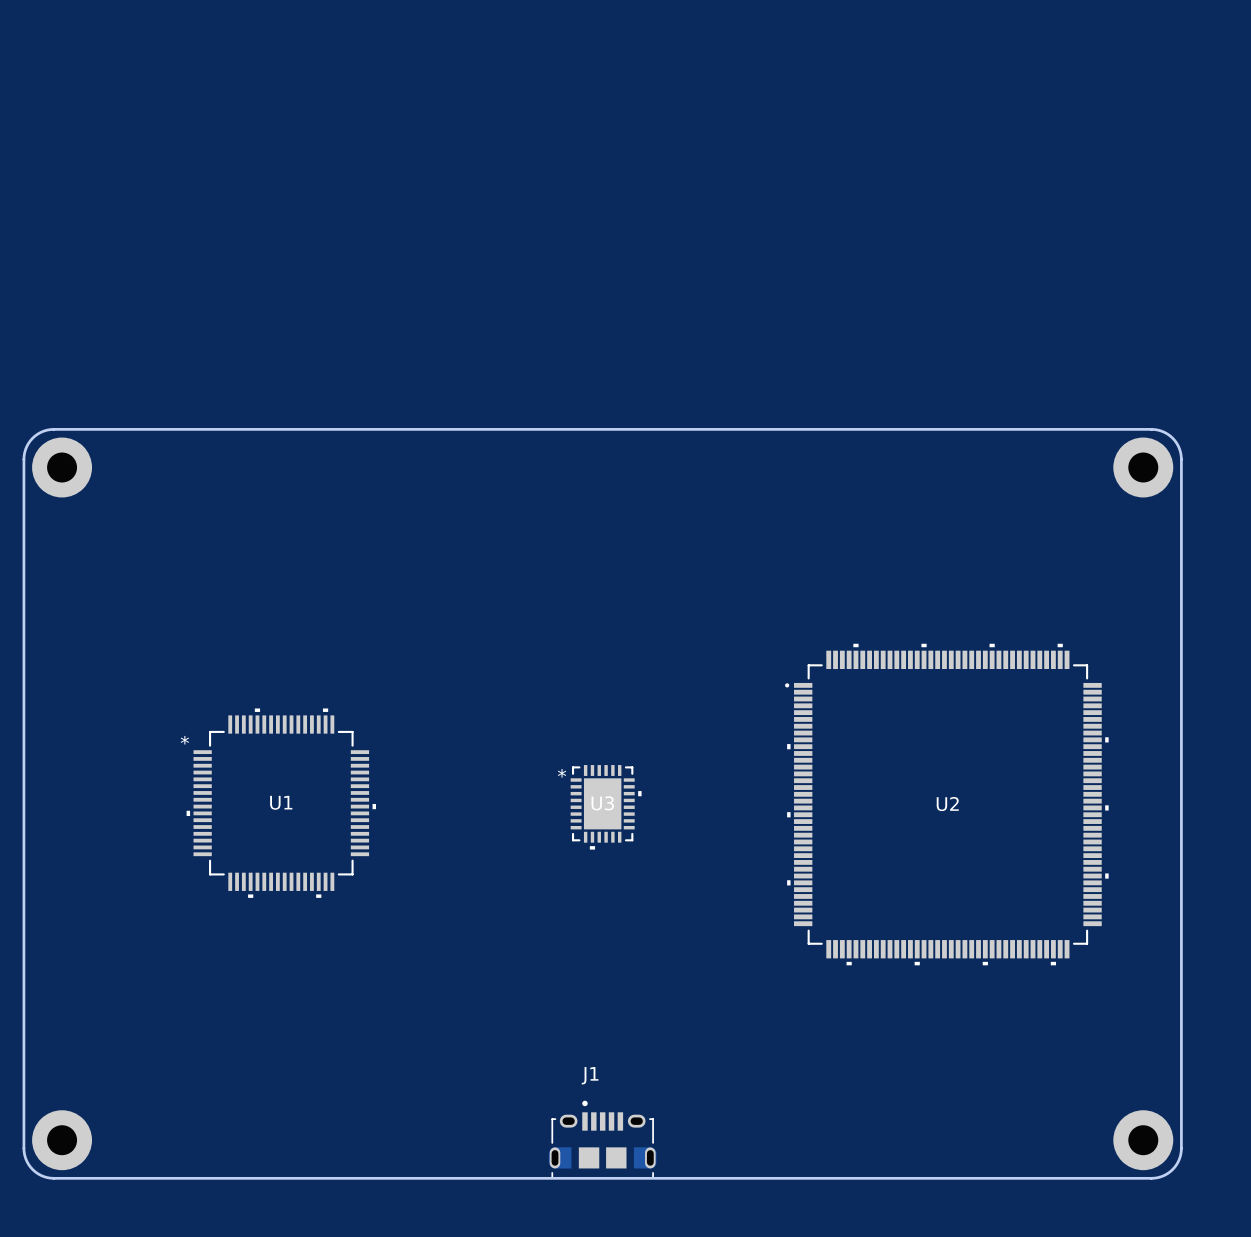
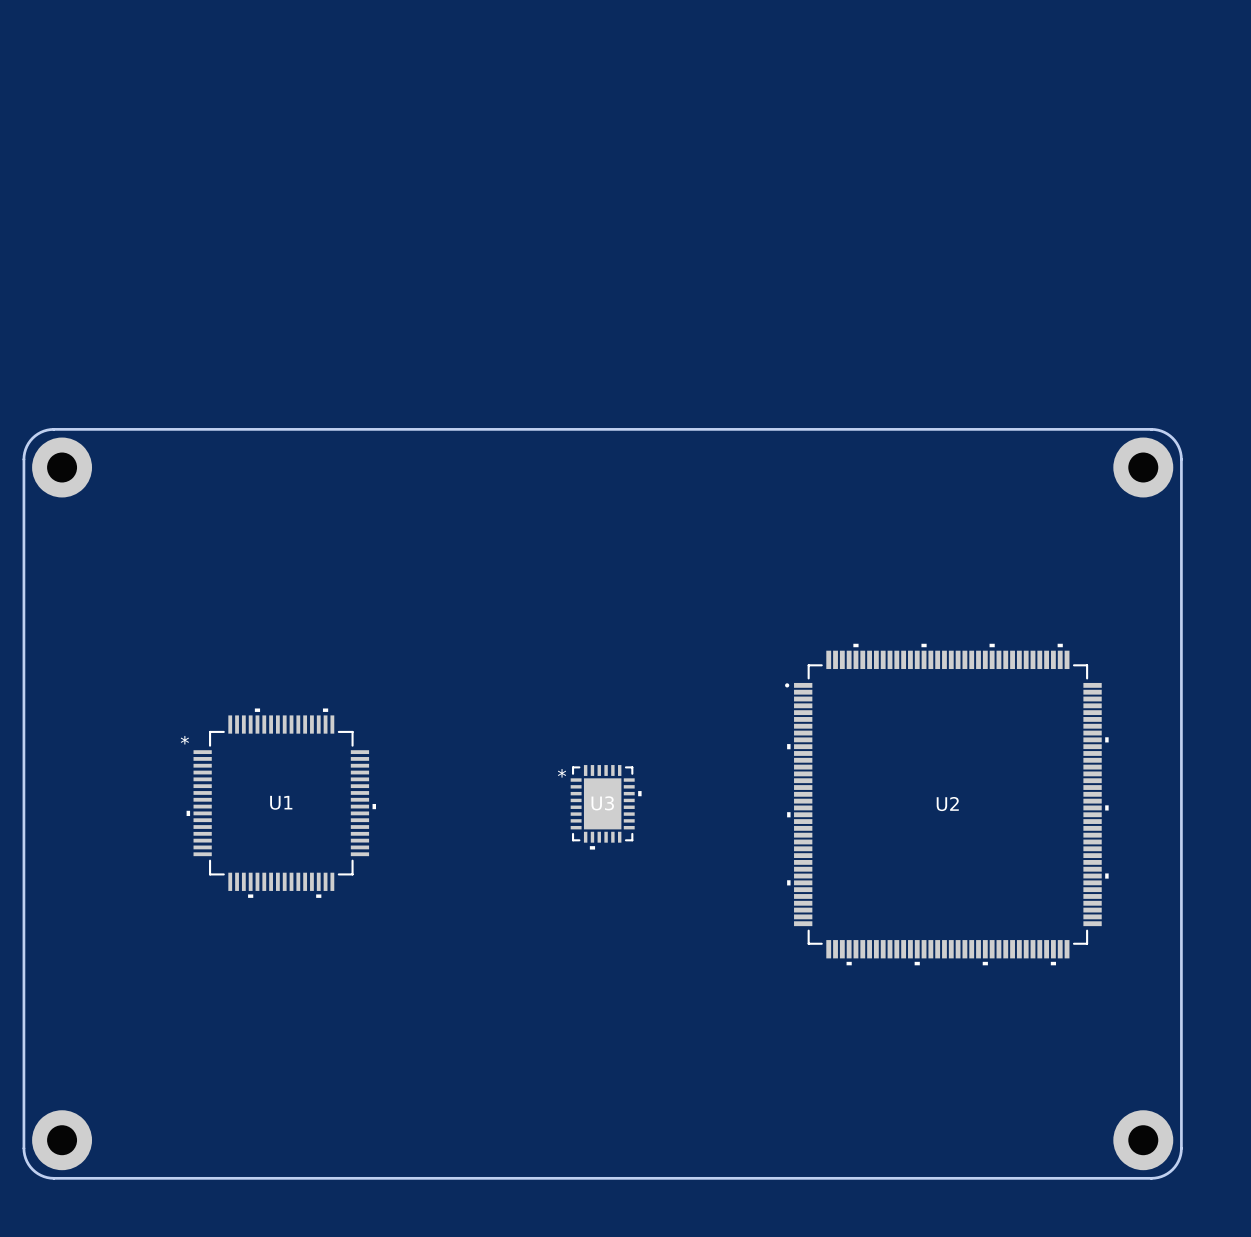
J1: (602, 1139) -> none

